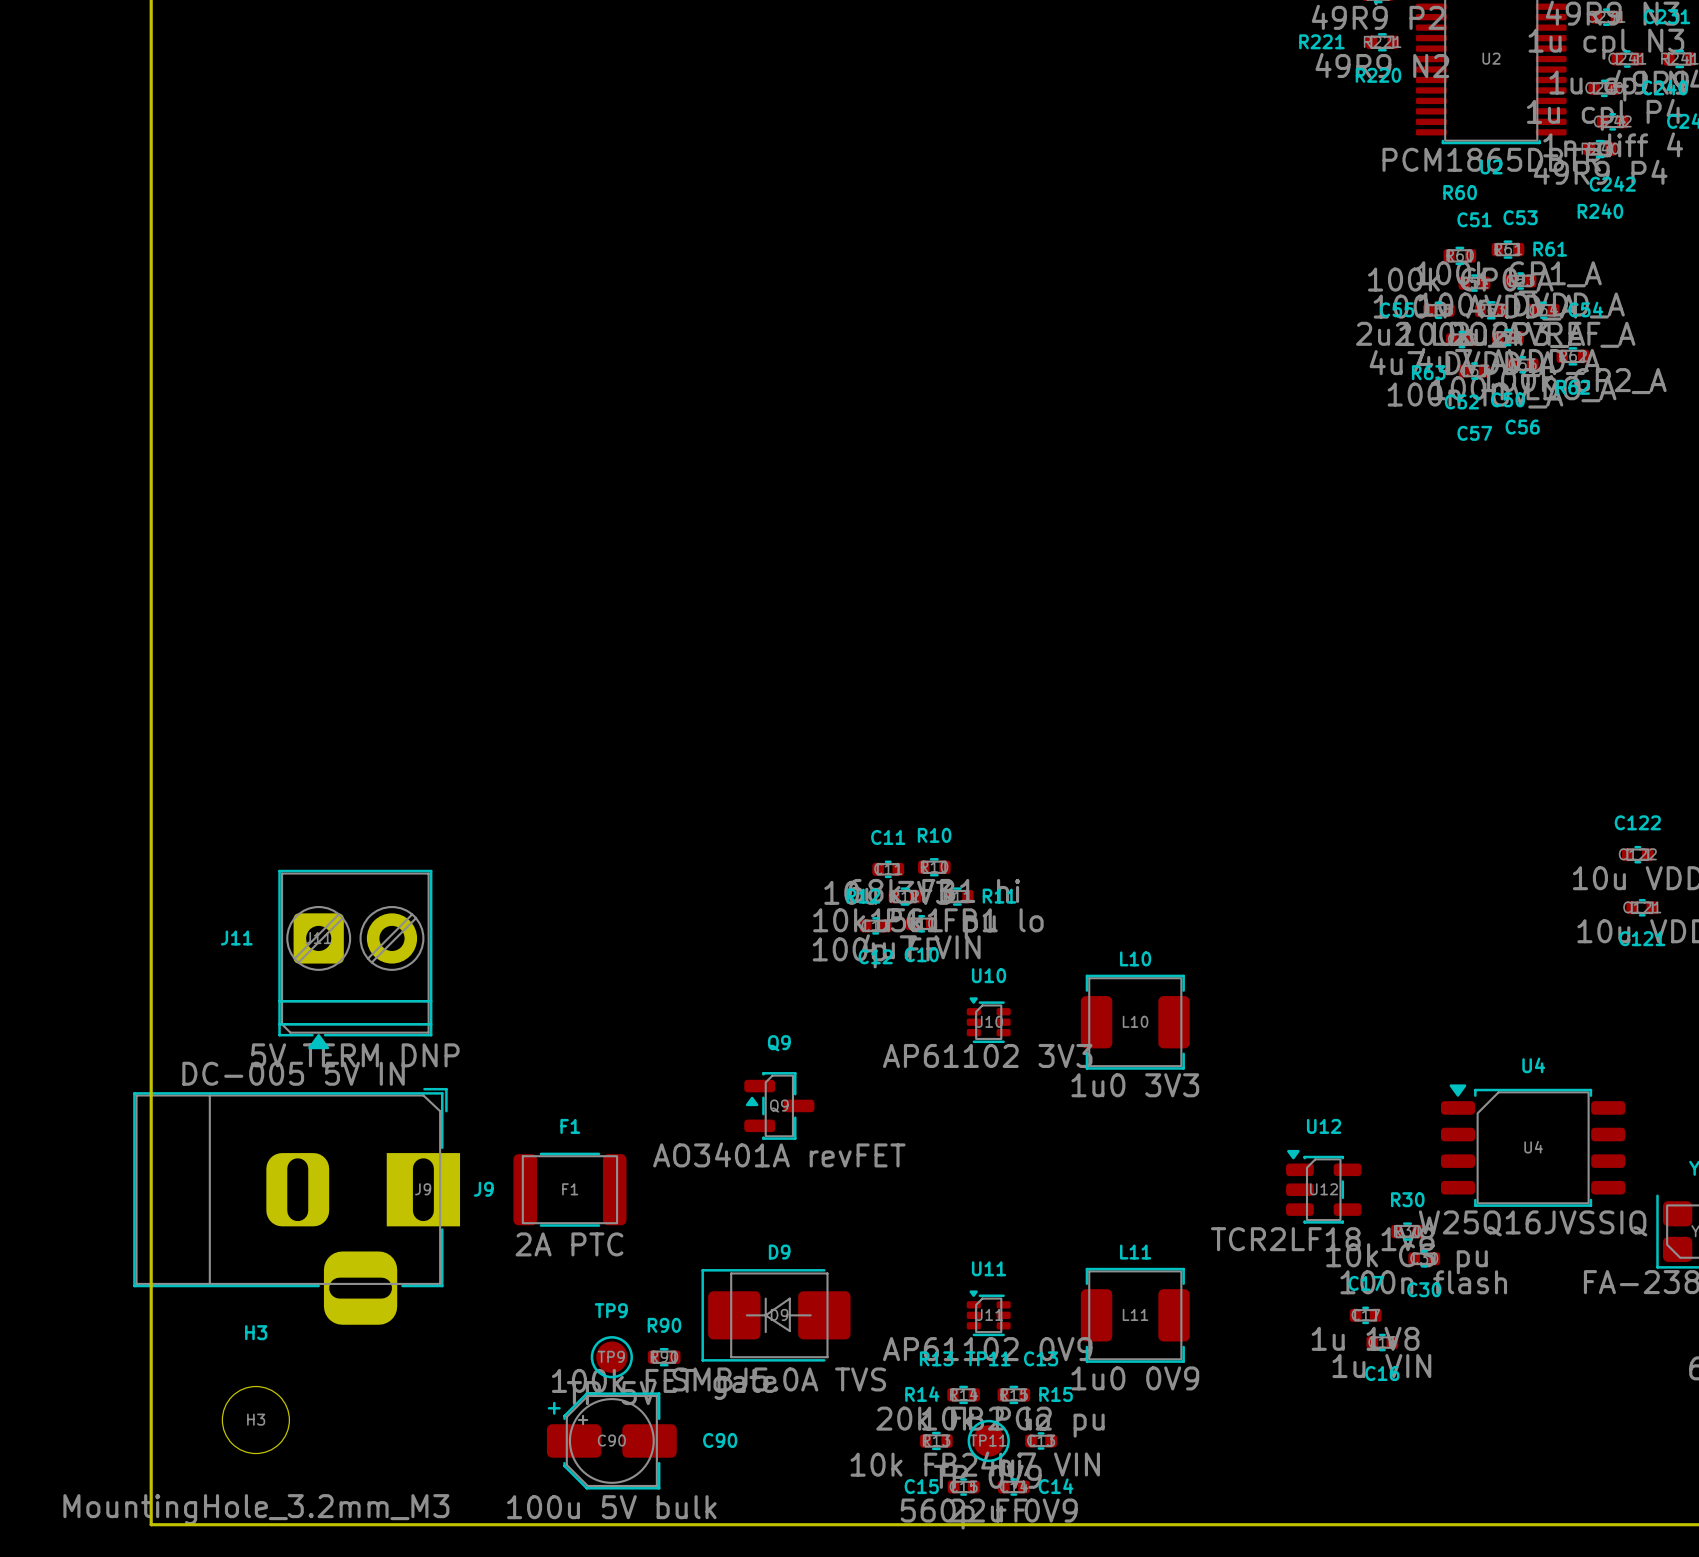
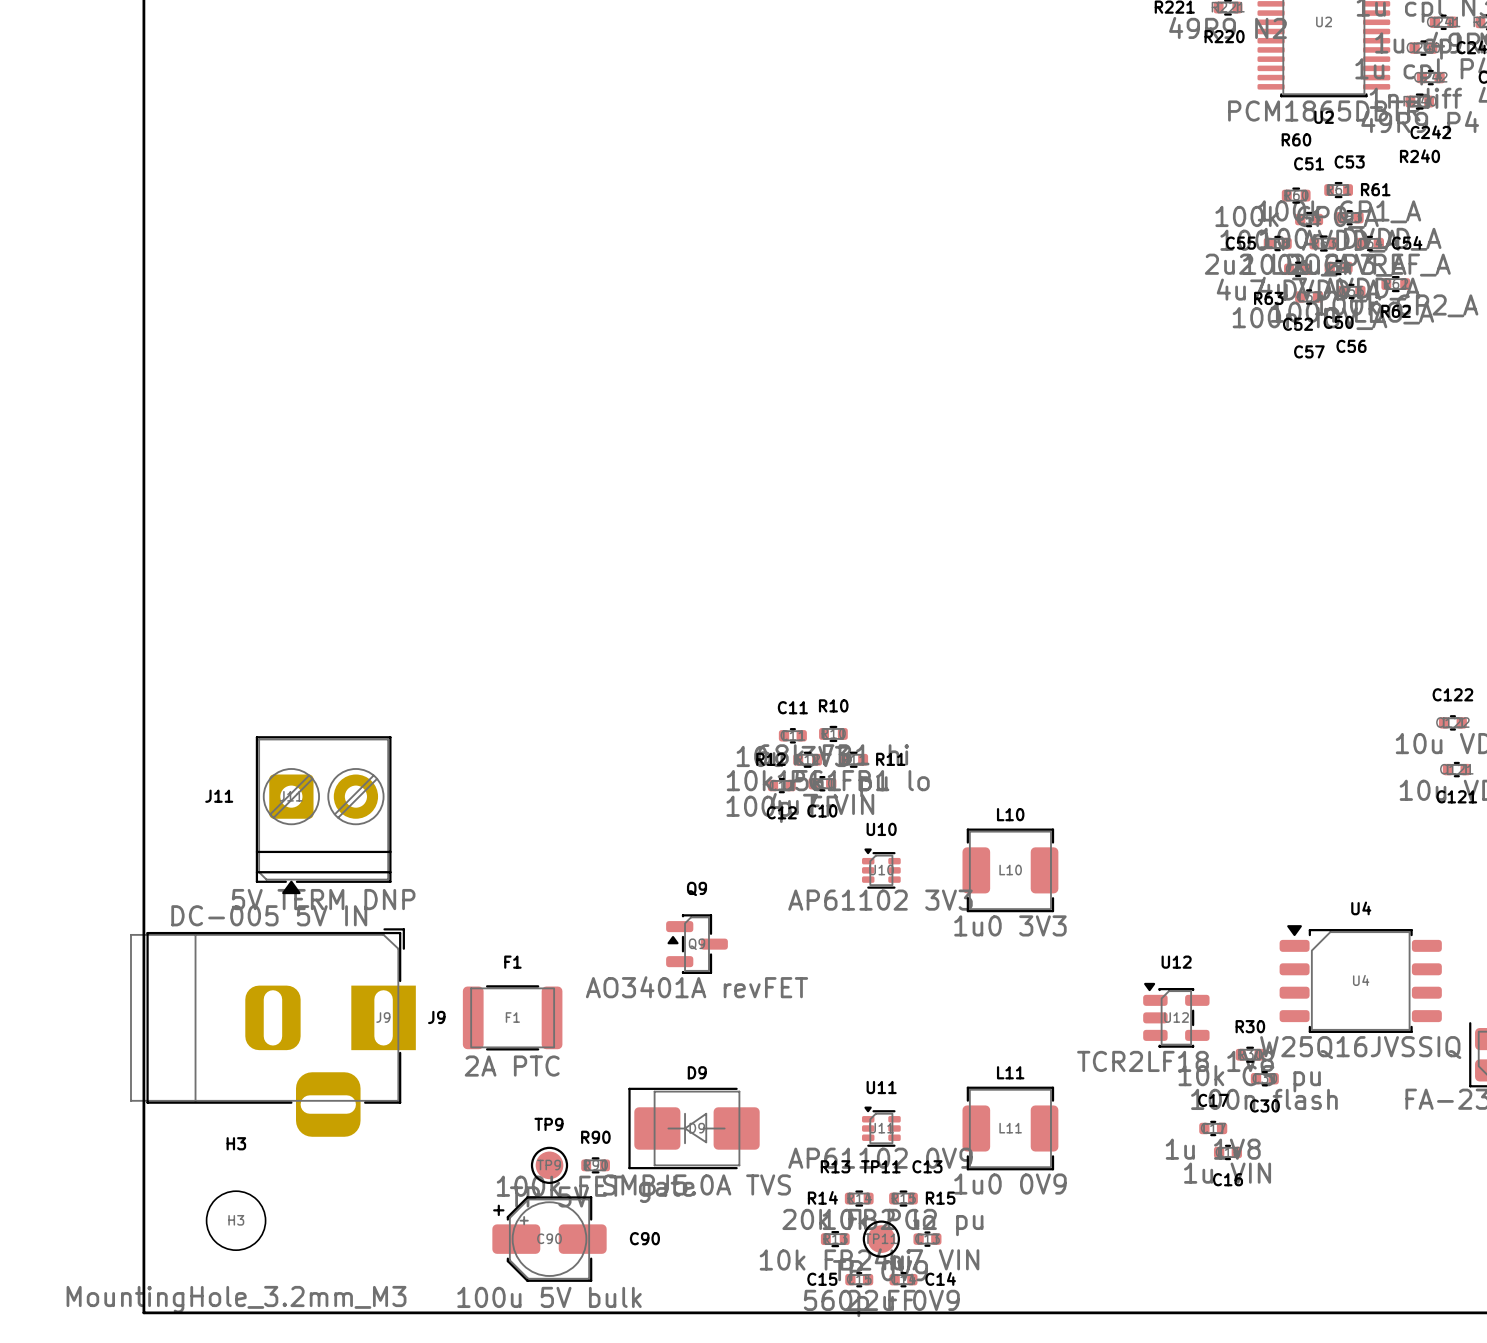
J9 footprint: [133, 1087, 461, 1325] -> [130, 928, 416, 1137]

